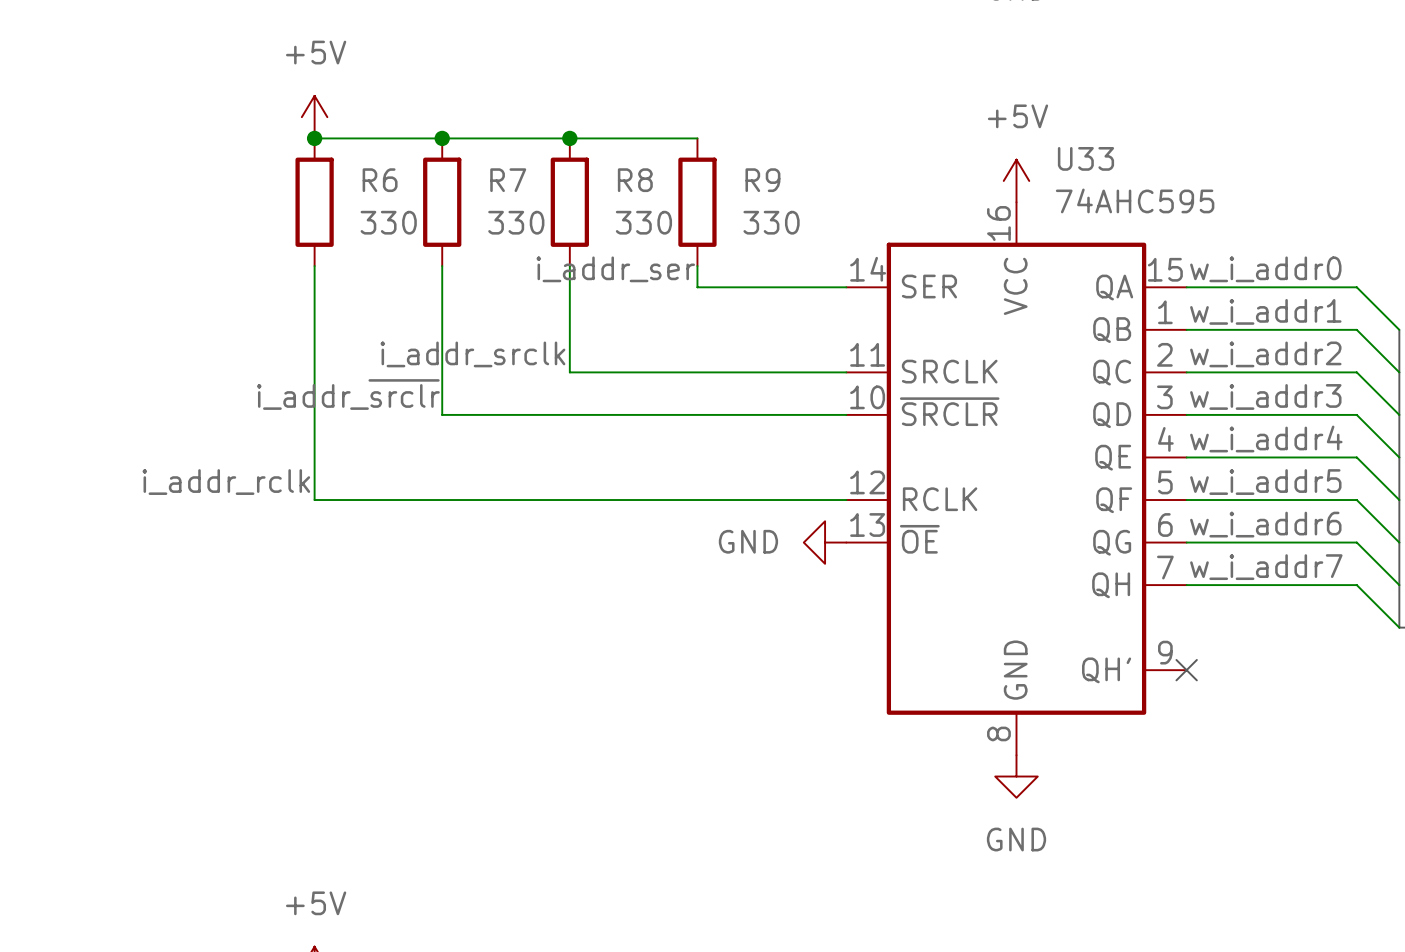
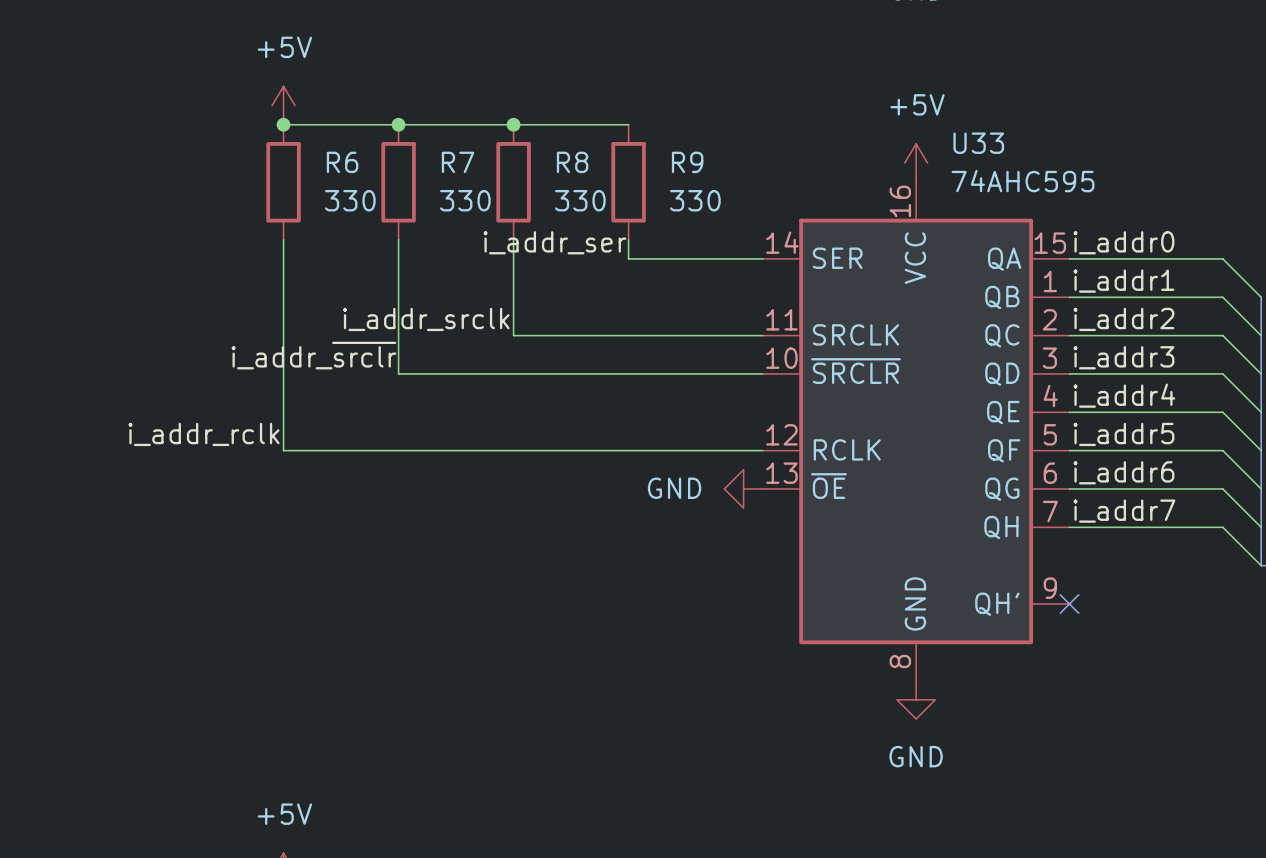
label: w_i_addr0 (1265, 269) -> i_addr0 (1123, 242)
label: w_i_addr1 (1265, 311) -> i_addr1 (1123, 281)
label: w_i_addr2 (1265, 354) -> i_addr2 (1123, 319)
label: w_i_addr3 (1265, 396) -> i_addr3 (1123, 357)
label: w_i_addr4 (1266, 438) -> i_addr4 (1124, 395)
label: w_i_addr5 (1265, 482) -> i_addr5 (1123, 434)
label: w_i_addr6 (1265, 524) -> i_addr6 (1123, 472)
label: w_i_addr7 (1266, 567) -> i_addr7 (1124, 511)

